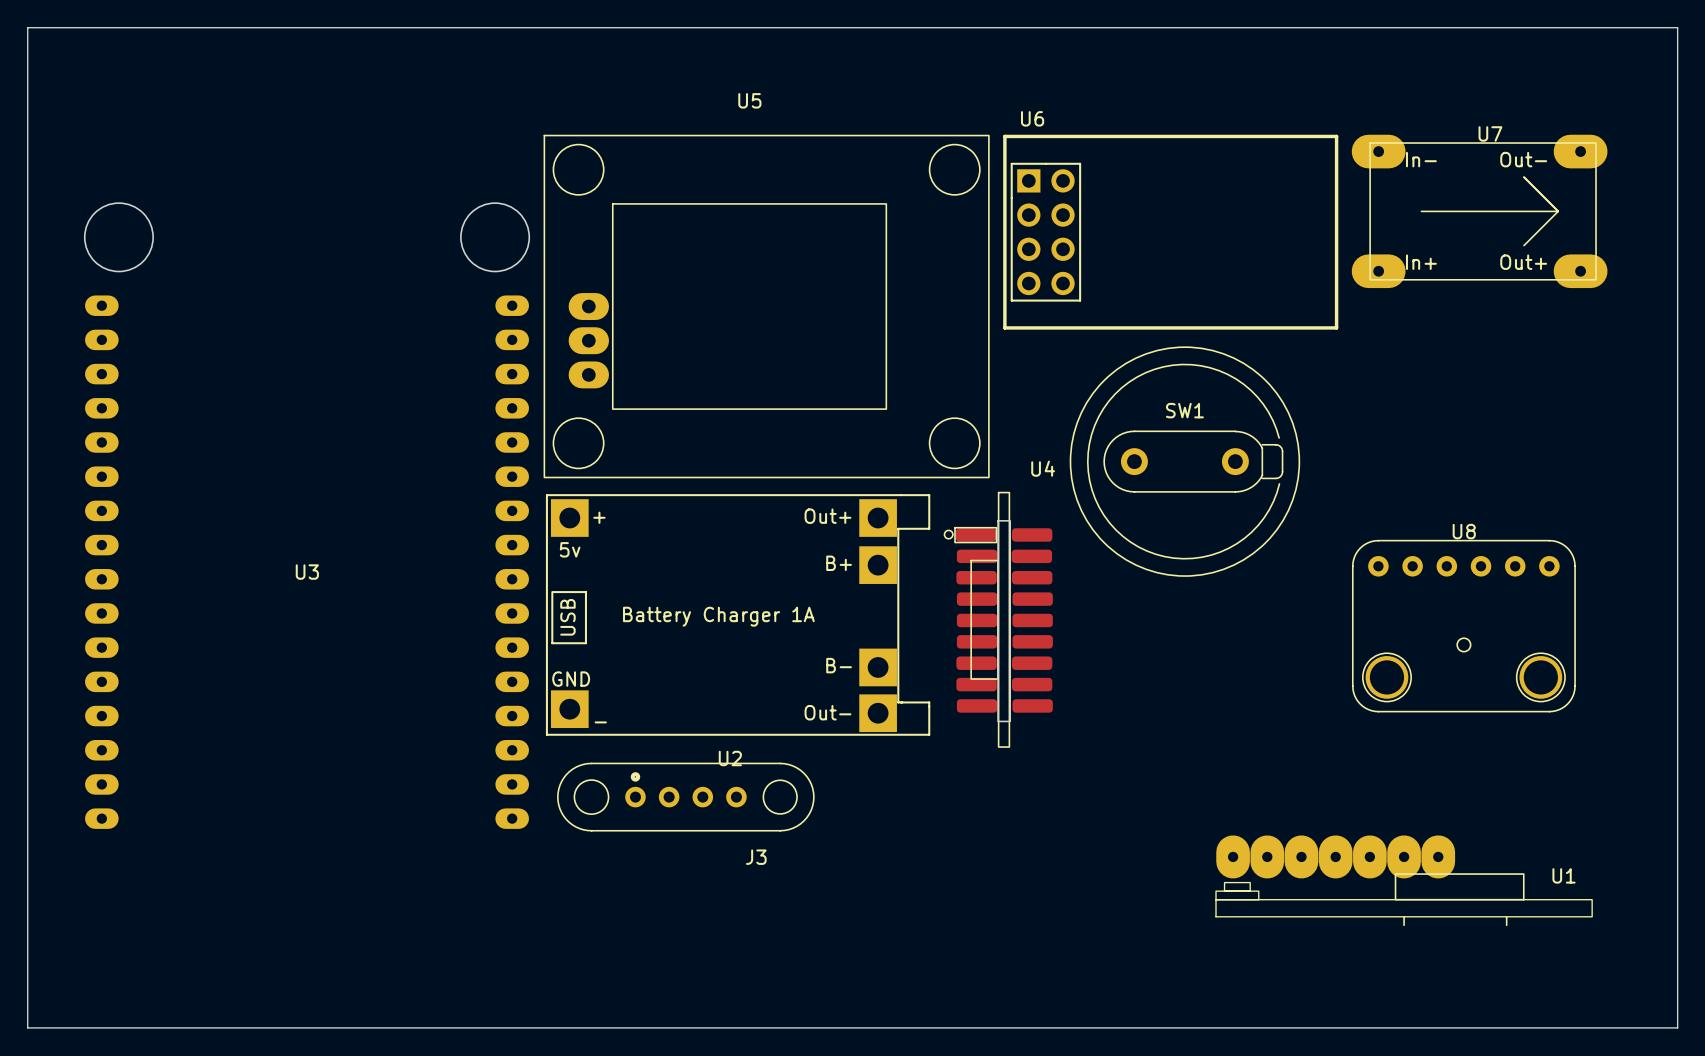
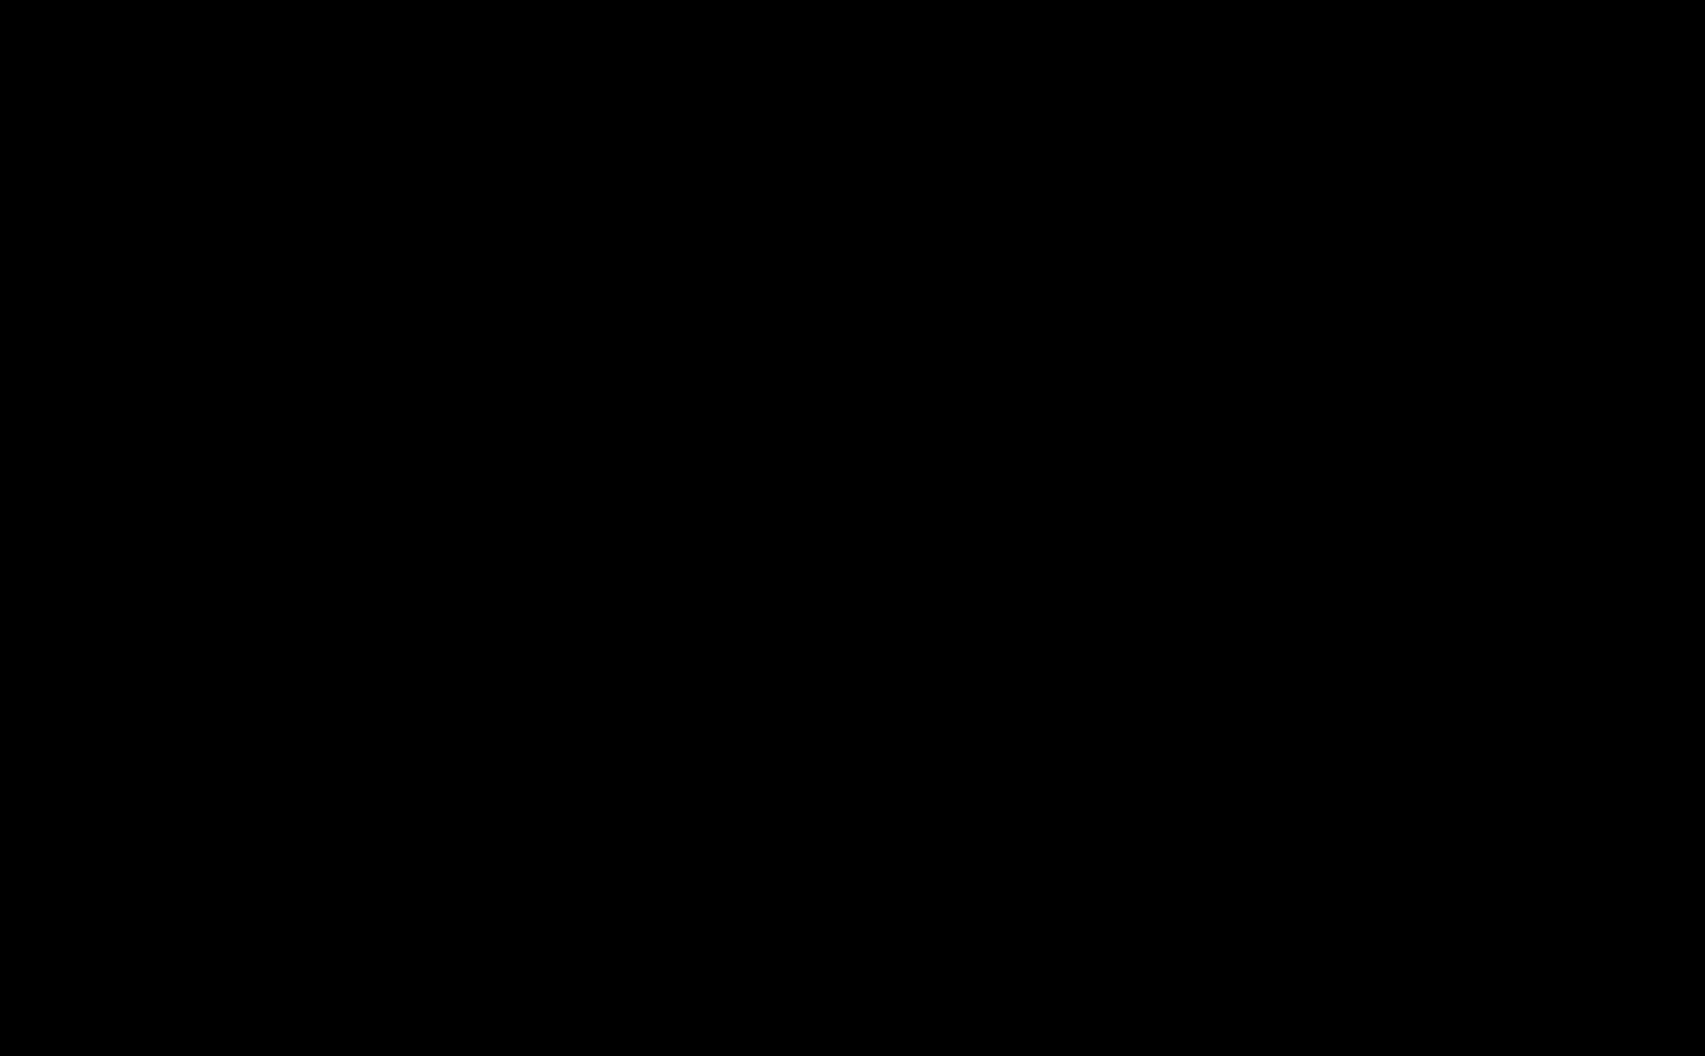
board edge: (27, 27) (1677, 27) (1677, 1027) (27, 1027) (27, 27) -> none
U7: (1479, 211) -> none
U6: (1170, 232) -> none
U5: (766, 306) -> none
SW1: (1184, 461) -> none
U3: (307, 515) -> none
U2: (738, 614) -> none
U4: (998, 619) -> none
U8: (1463, 626) -> none
J3: (685, 797) -> none
U1: (1404, 880) -> none

